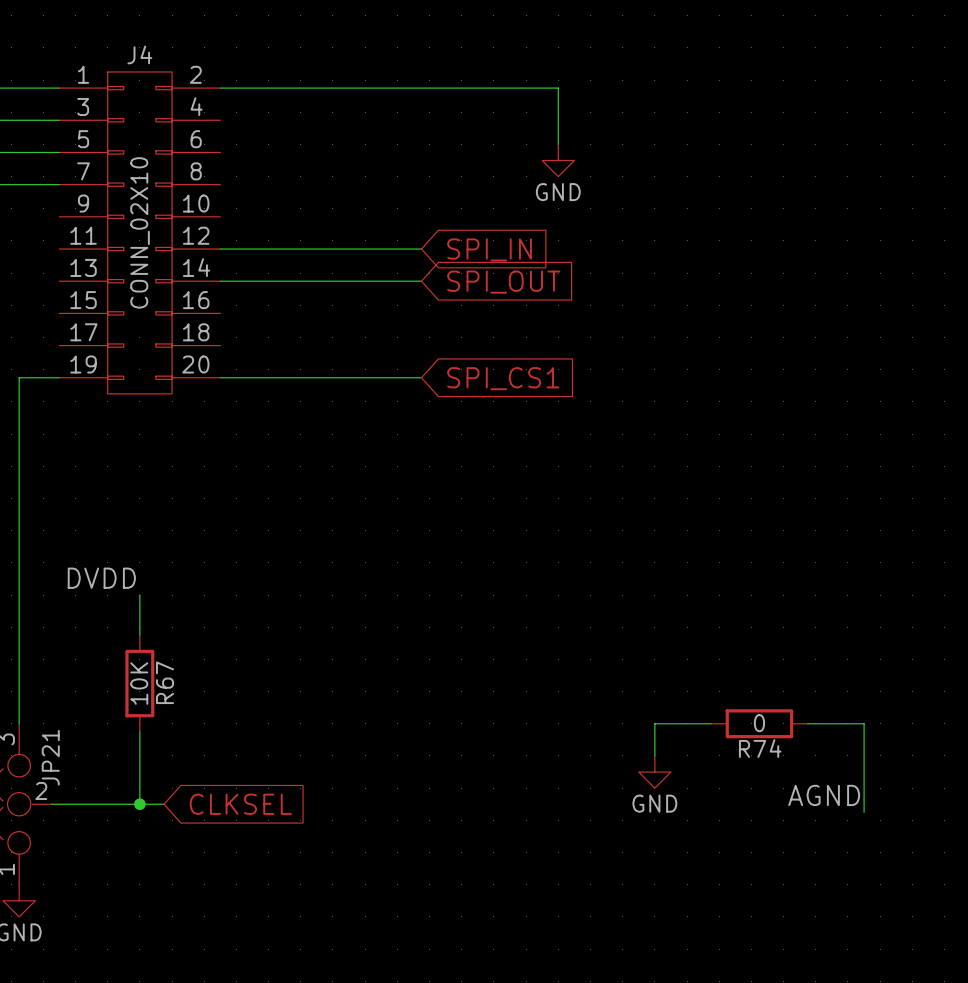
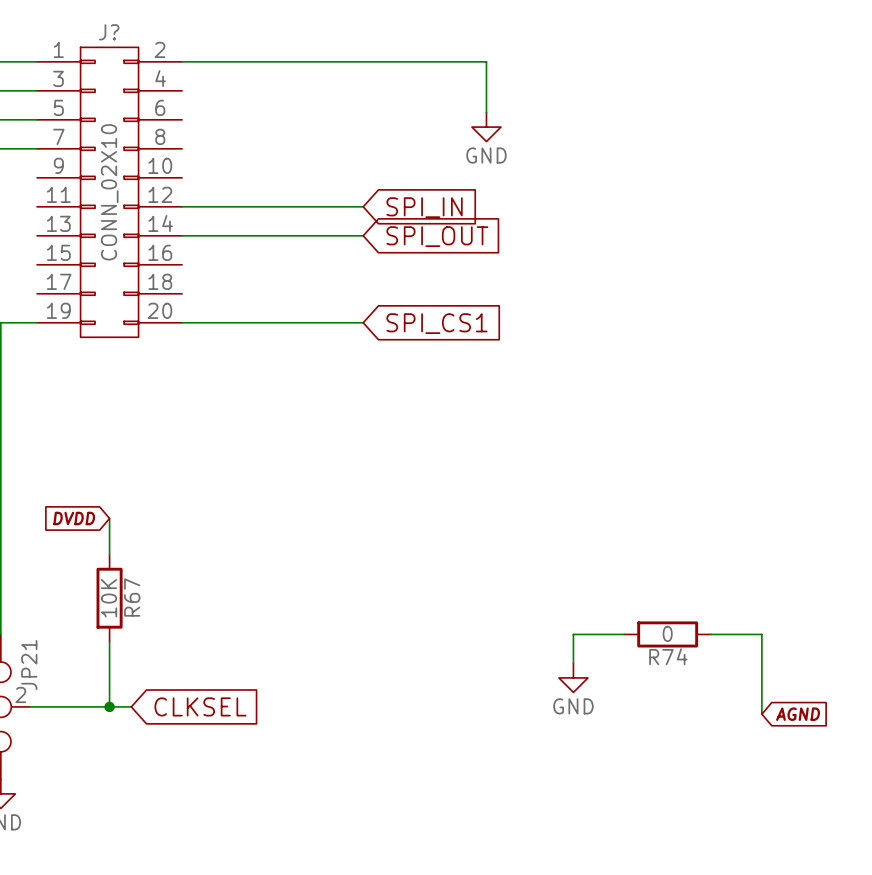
J4 name: J4 (139, 54) -> J? (109, 32)
label: DVDD (101, 578) -> none
global label: none -> DVDD (74, 518)
label: AGND (824, 795) -> none
global label: none -> AGND (798, 714)

